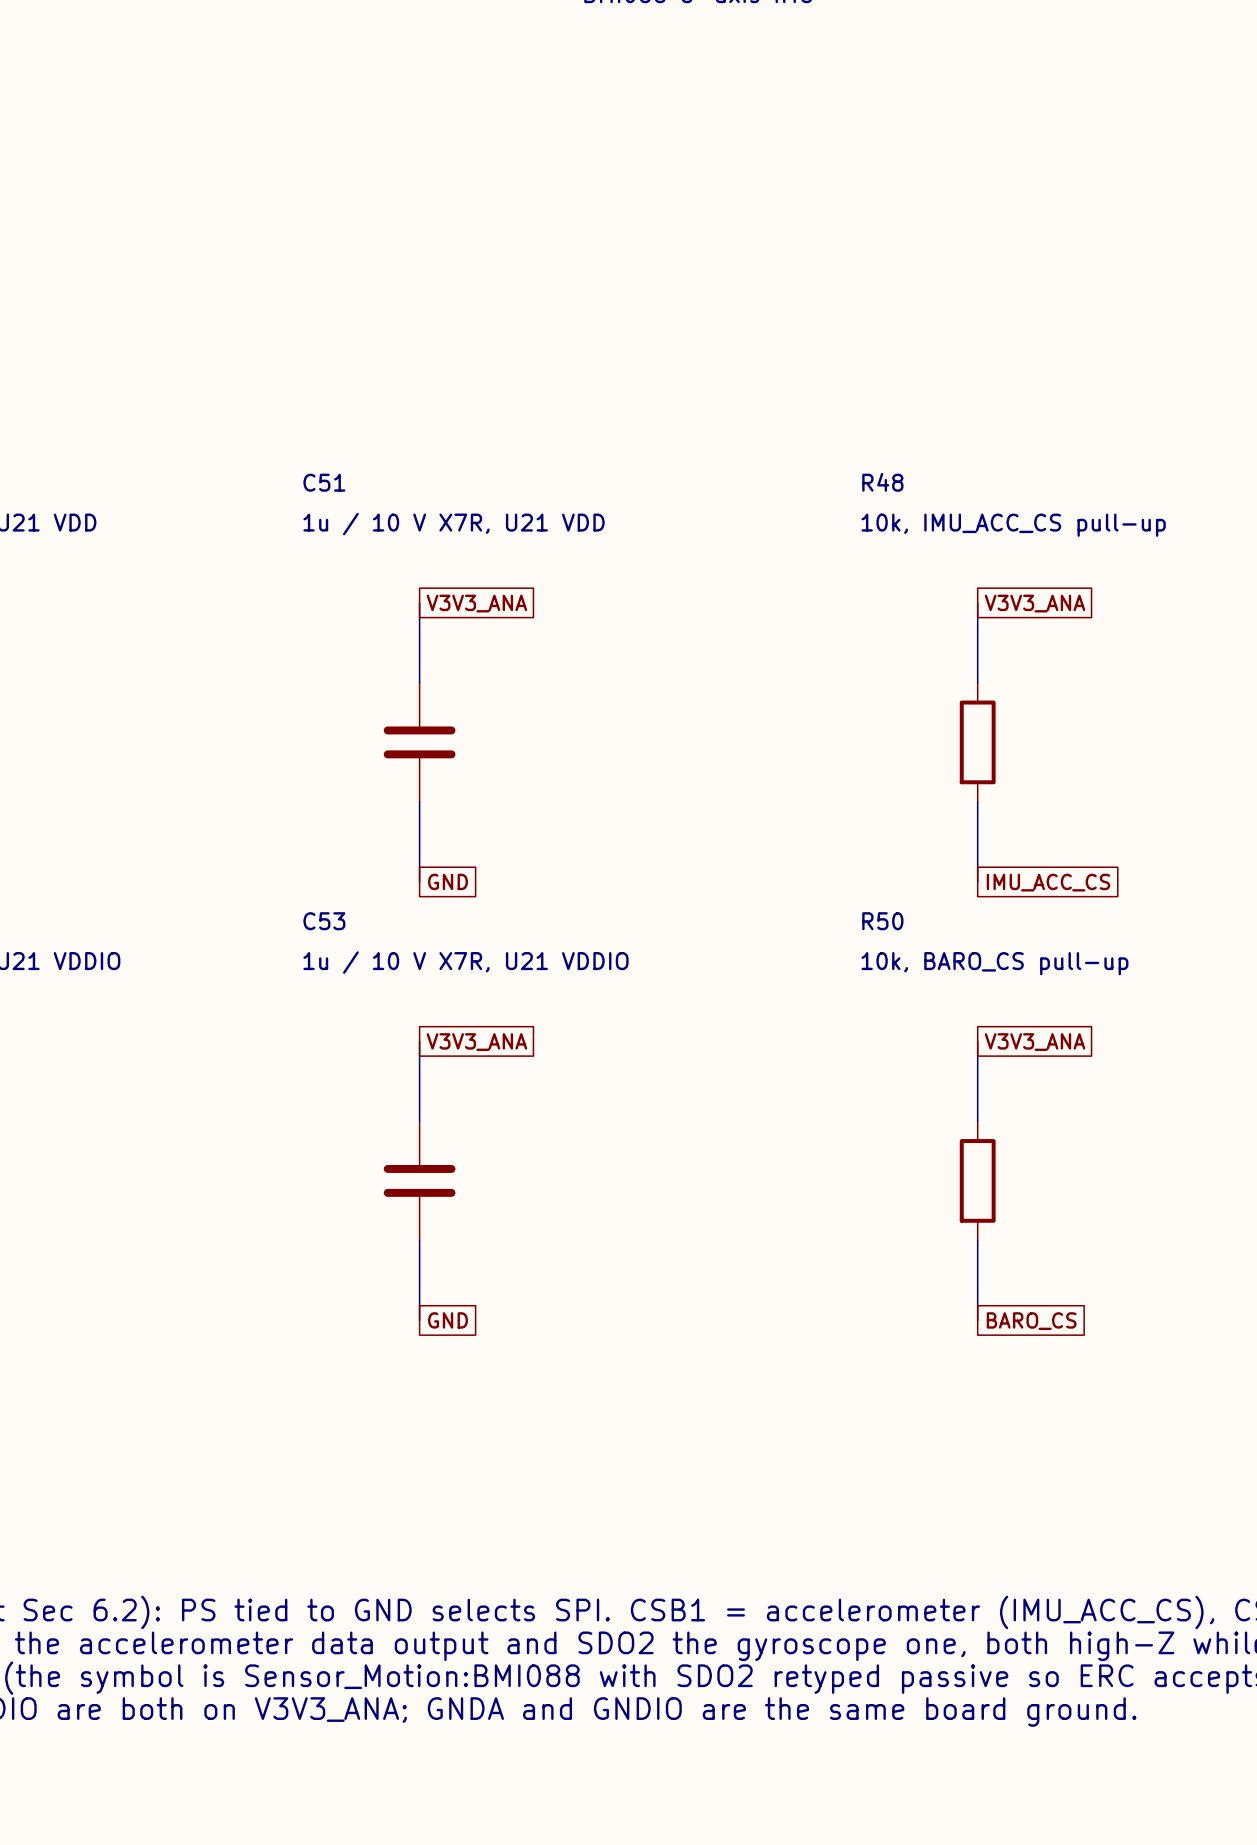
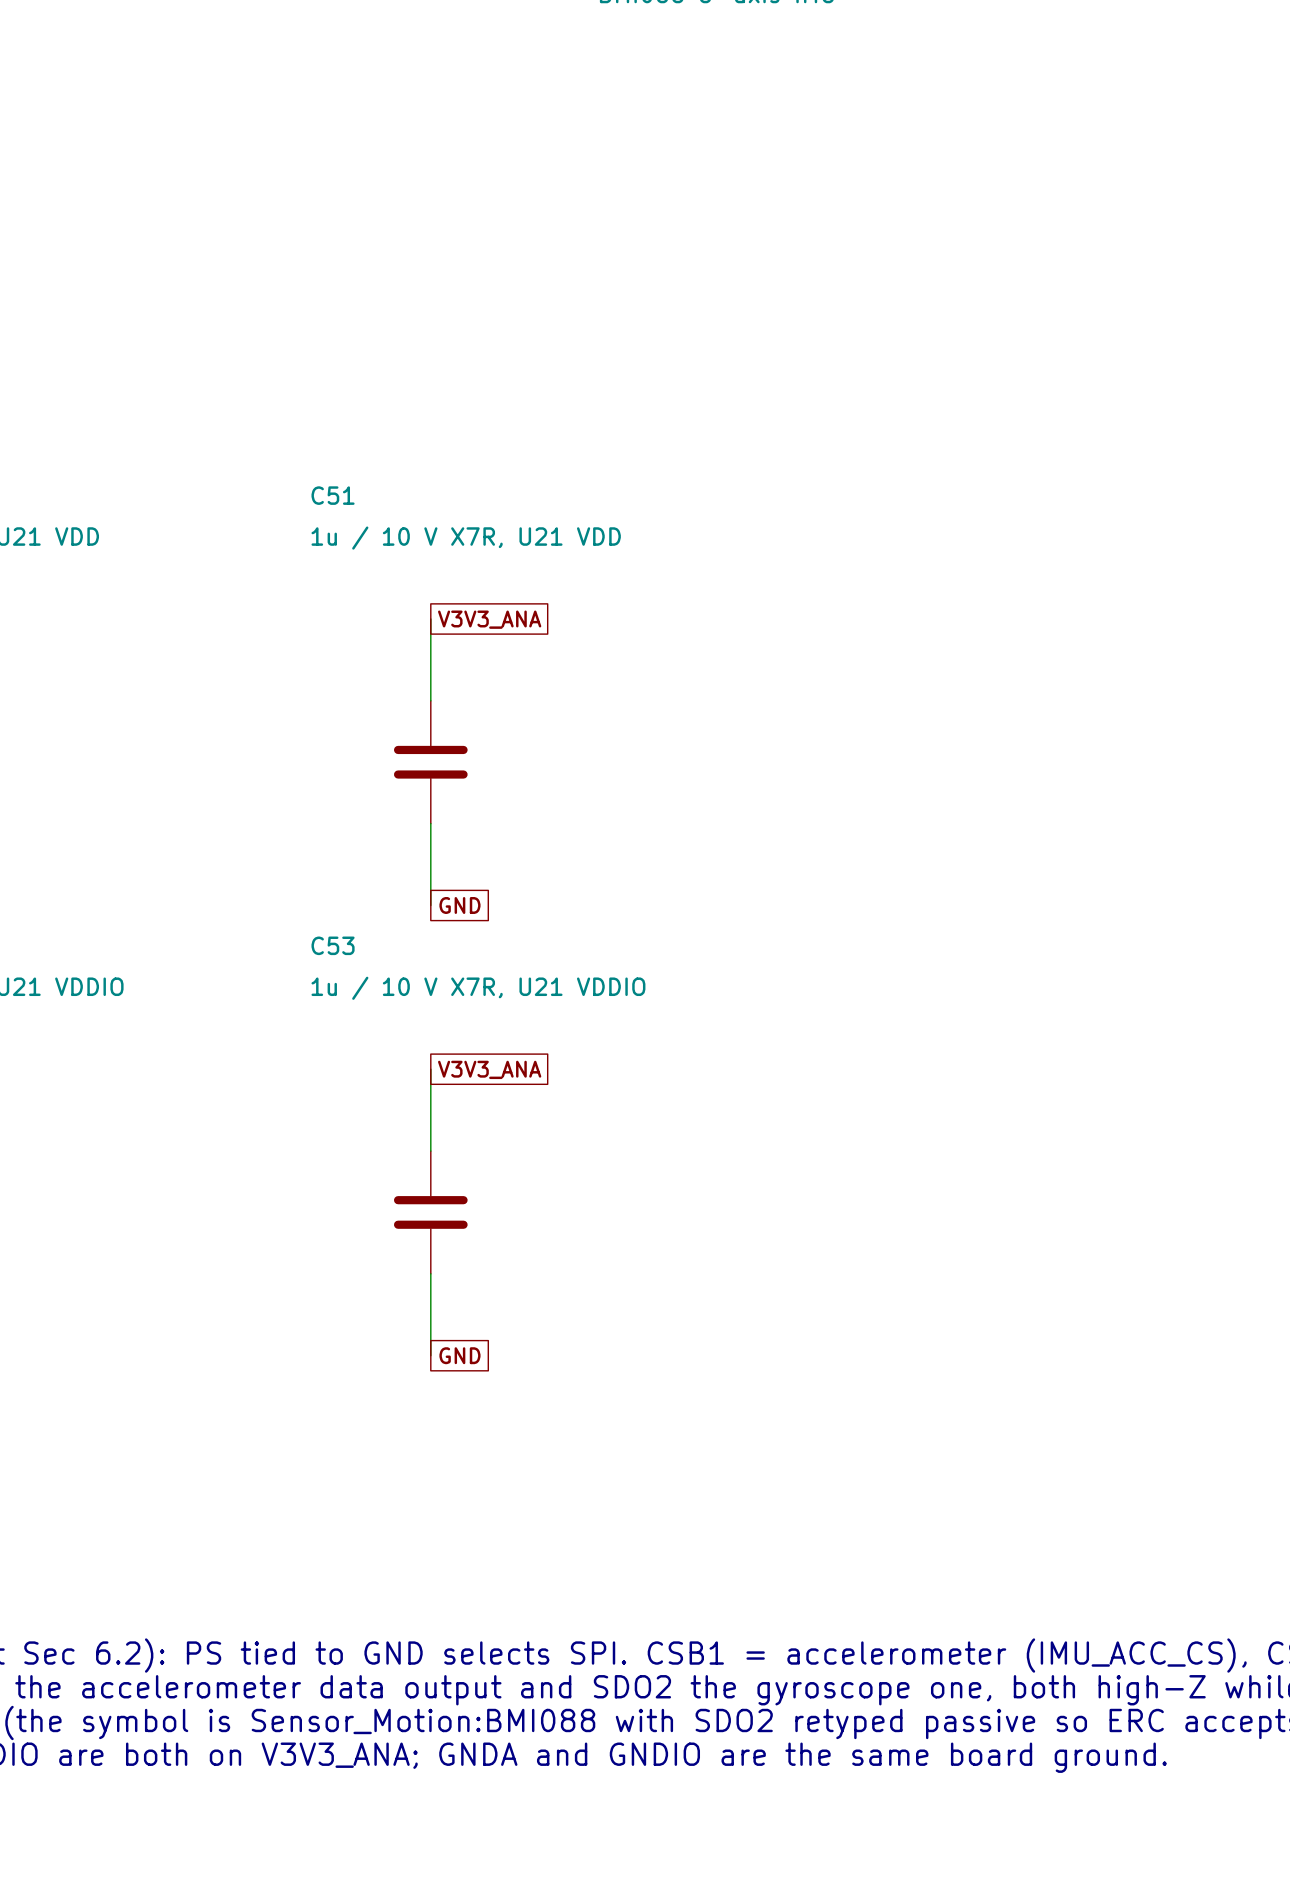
wire: (977, 602) (977, 682) -> none
global label: V3V3_ANA (1035, 603) -> none
R48: 10k, IMU_ACC_CS pull-up (977, 742) -> none
wire: (977, 802) (977, 881) -> none
global label: IMU_ACC_CS (1048, 882) -> none
wire: (977, 1041) (977, 1121) -> none
global label: V3V3_ANA (1035, 1042) -> none
R50: 10k, BARO_CS pull-up (977, 1180) -> none
wire: (977, 1240) (977, 1320) -> none
global label: BARO_CS (1031, 1321) -> none

